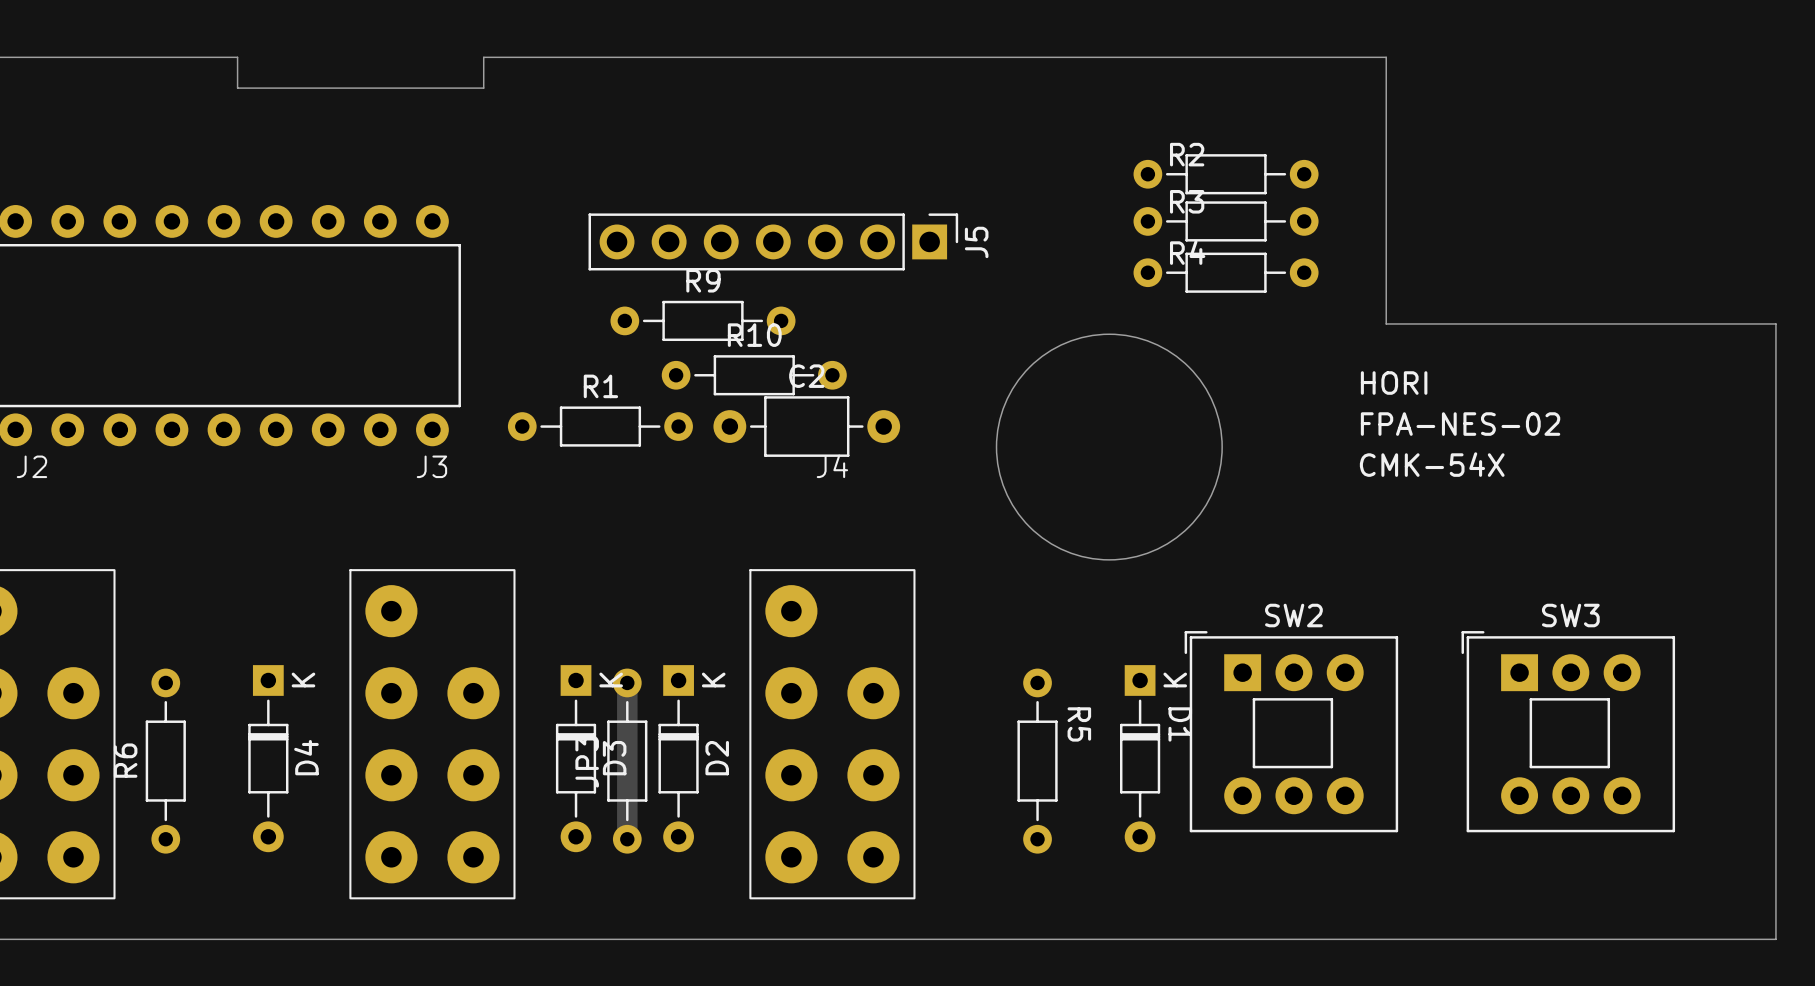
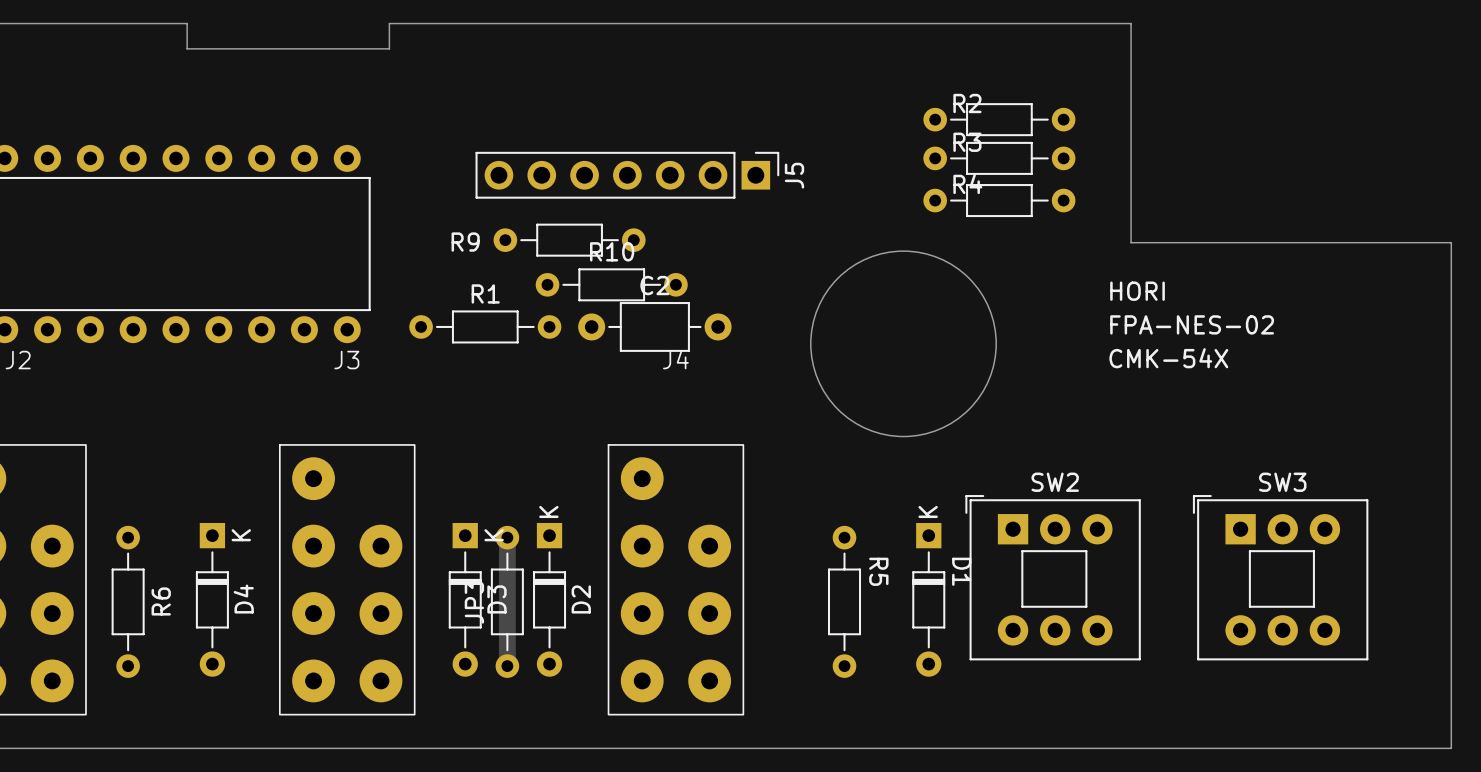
R9 name position: R9 (703, 280) -> R9 (465, 242)
D2 text position: K (713, 679) -> K (548, 511)
D1 text position: K (1175, 679) -> K (928, 511)
R6 name position: R6 (125, 760) -> R6 (161, 601)

